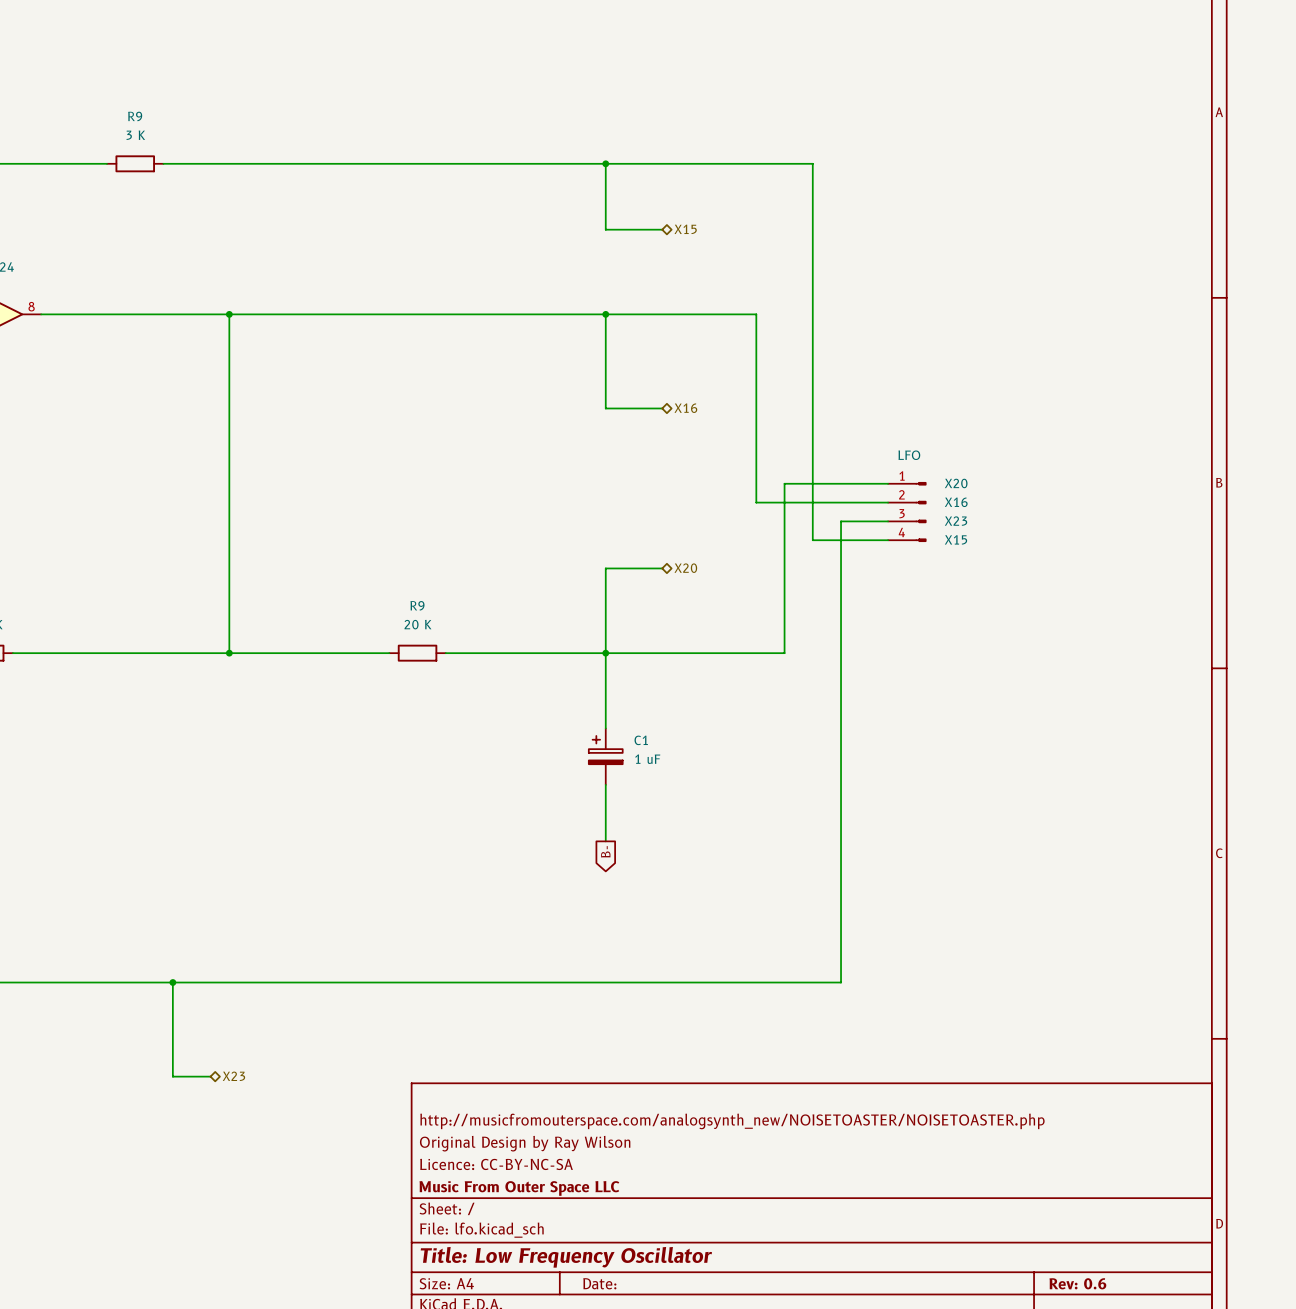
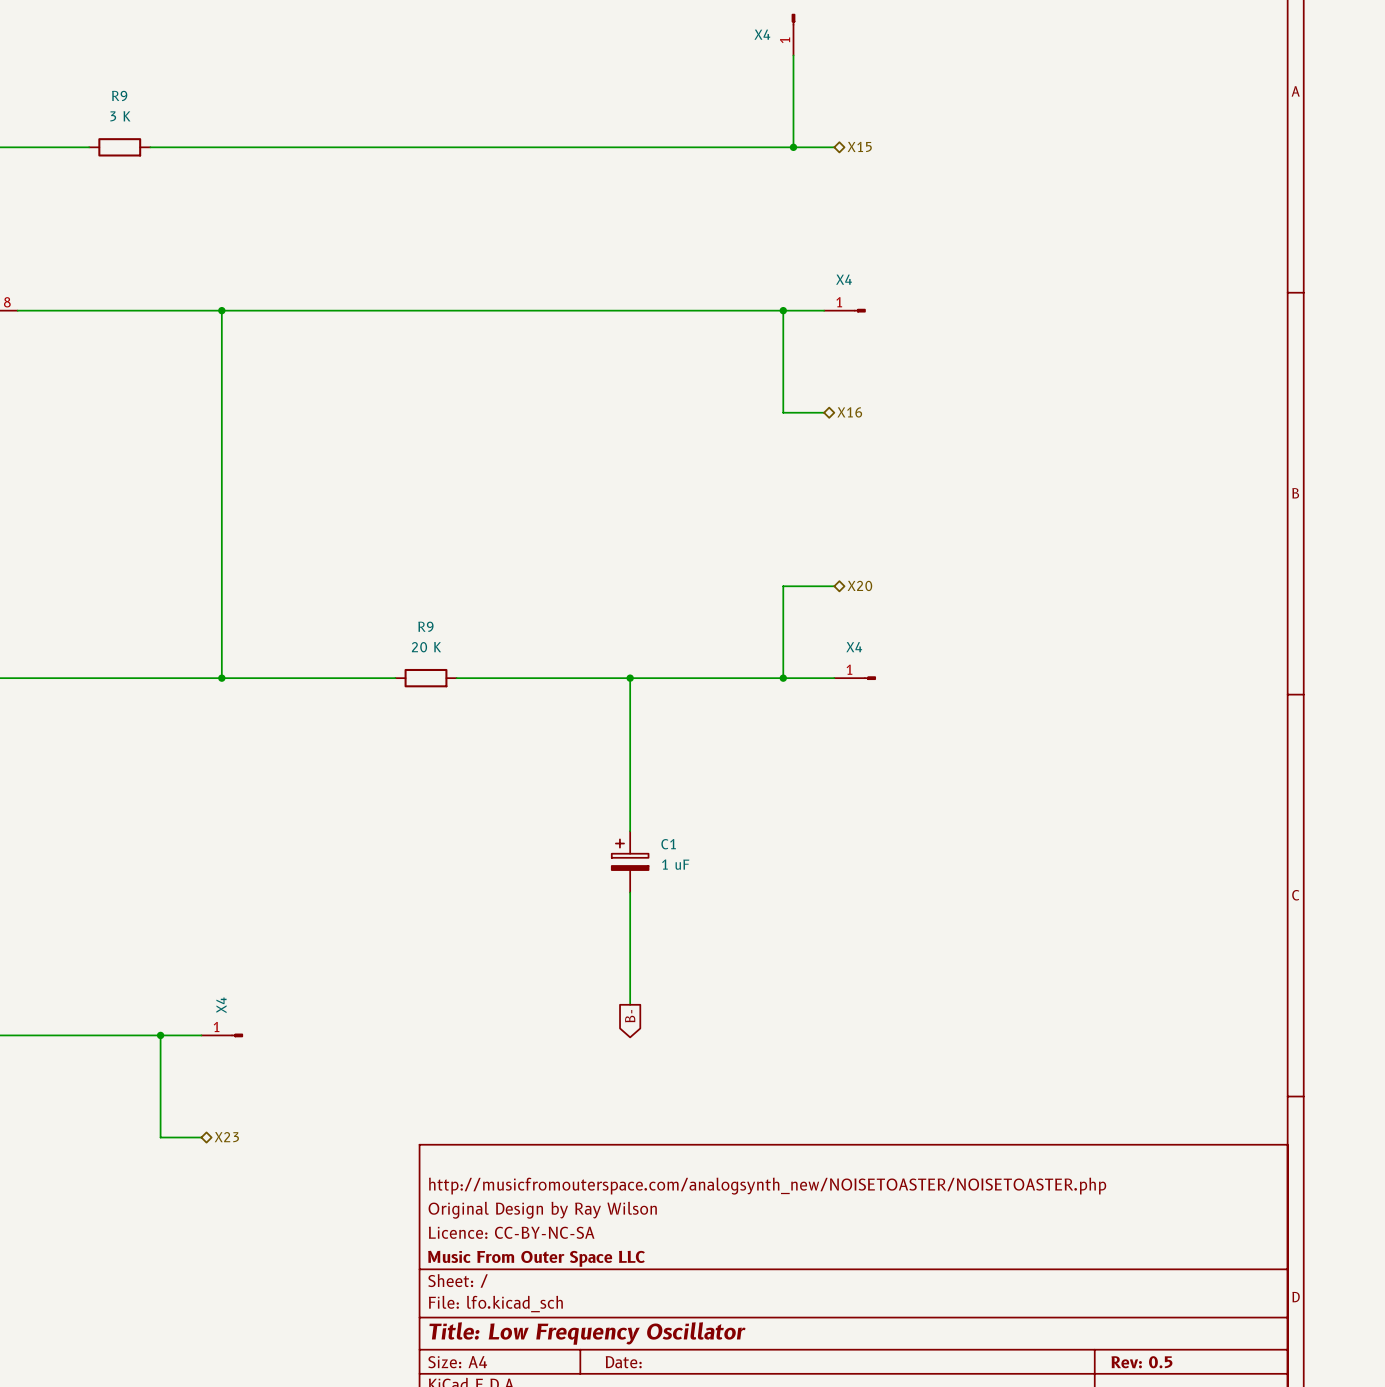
X4: none -> (793, 34)
wire: none -> (793, 55) (793, 147)
wire: (605, 163) (605, 229) (662, 229) -> none
junction: (605, 163) -> none
junction: none -> (793, 147)
wire: (793, 163) (812, 163) (812, 540) (888, 540) -> none
hierarchical label position: X15 (685, 229) -> X15 (859, 146)
wire: (605, 314) (605, 408) (662, 408) -> none
junction: (605, 314) -> none
wire: none -> (783, 310) (783, 412) (824, 412)
junction: none -> (783, 310)
wire: (756, 314) (756, 502) (888, 502) -> (793, 310) (824, 310)
X4: none -> (844, 310)
hierarchical label position: X16 (685, 408) -> X16 (849, 412)
wire: (888, 483) (784, 483) (784, 653) -> (834, 678) (824, 678)
part: LFO (907, 512) -> none
wire: (888, 521) (841, 521) (841, 982) (210, 982) -> none
wire: (662, 568) (605, 568) (605, 653) -> none
hierarchical label position: X20 (685, 568) -> X20 (859, 585)
wire: none -> (834, 586) (783, 586) (783, 678)
junction: none -> (783, 678)
X4: none -> (855, 678)
C1 position: (605, 756) -> (630, 861)
wire: none -> (630, 892) (630, 1004)
global label position: B- (605, 851) -> B- (630, 1016)
X4: none -> (222, 1035)
title block: Rev: 0.6 (1077, 1283) -> Rev: 0.5 (1141, 1362)

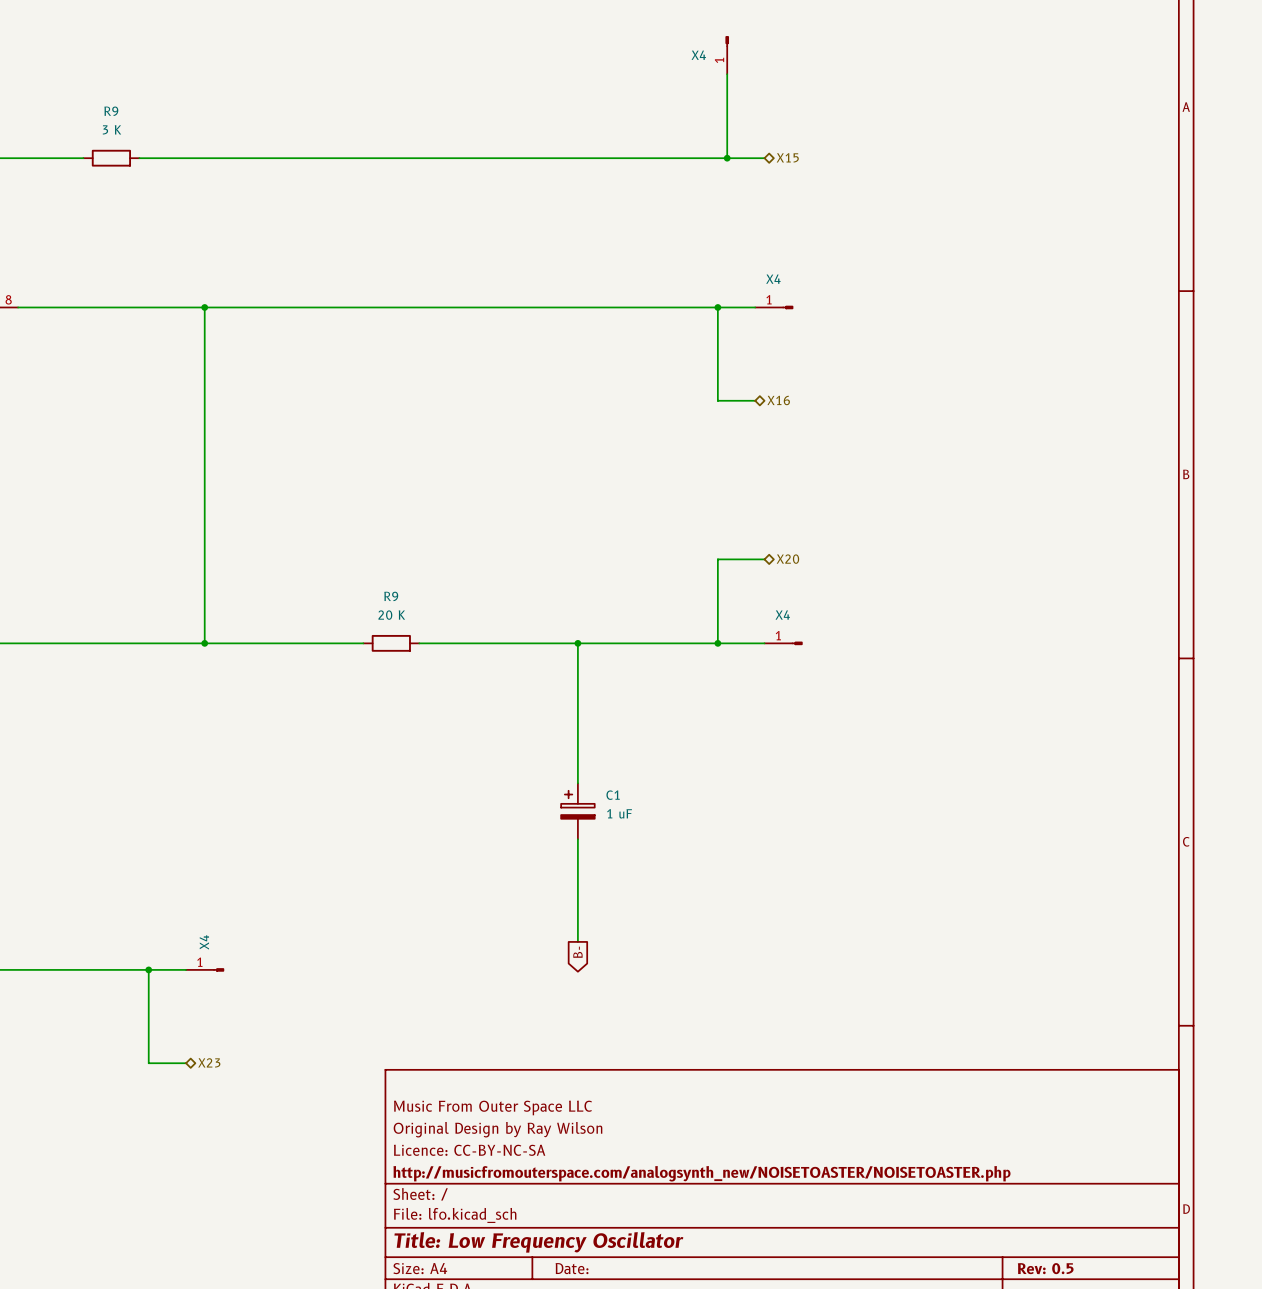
title block: http://musicfromouterspace.com/analogsynth_new/NOISETOASTER/NOISETOASTER.php (767, 1186) -> Music From Outer Space LLC (493, 1107)
title block: Music From Outer Space LLC (536, 1258) -> http://musicfromouterspace.com/analogsynth_new/NOISETOASTER/NOISETOASTER.php (702, 1173)

